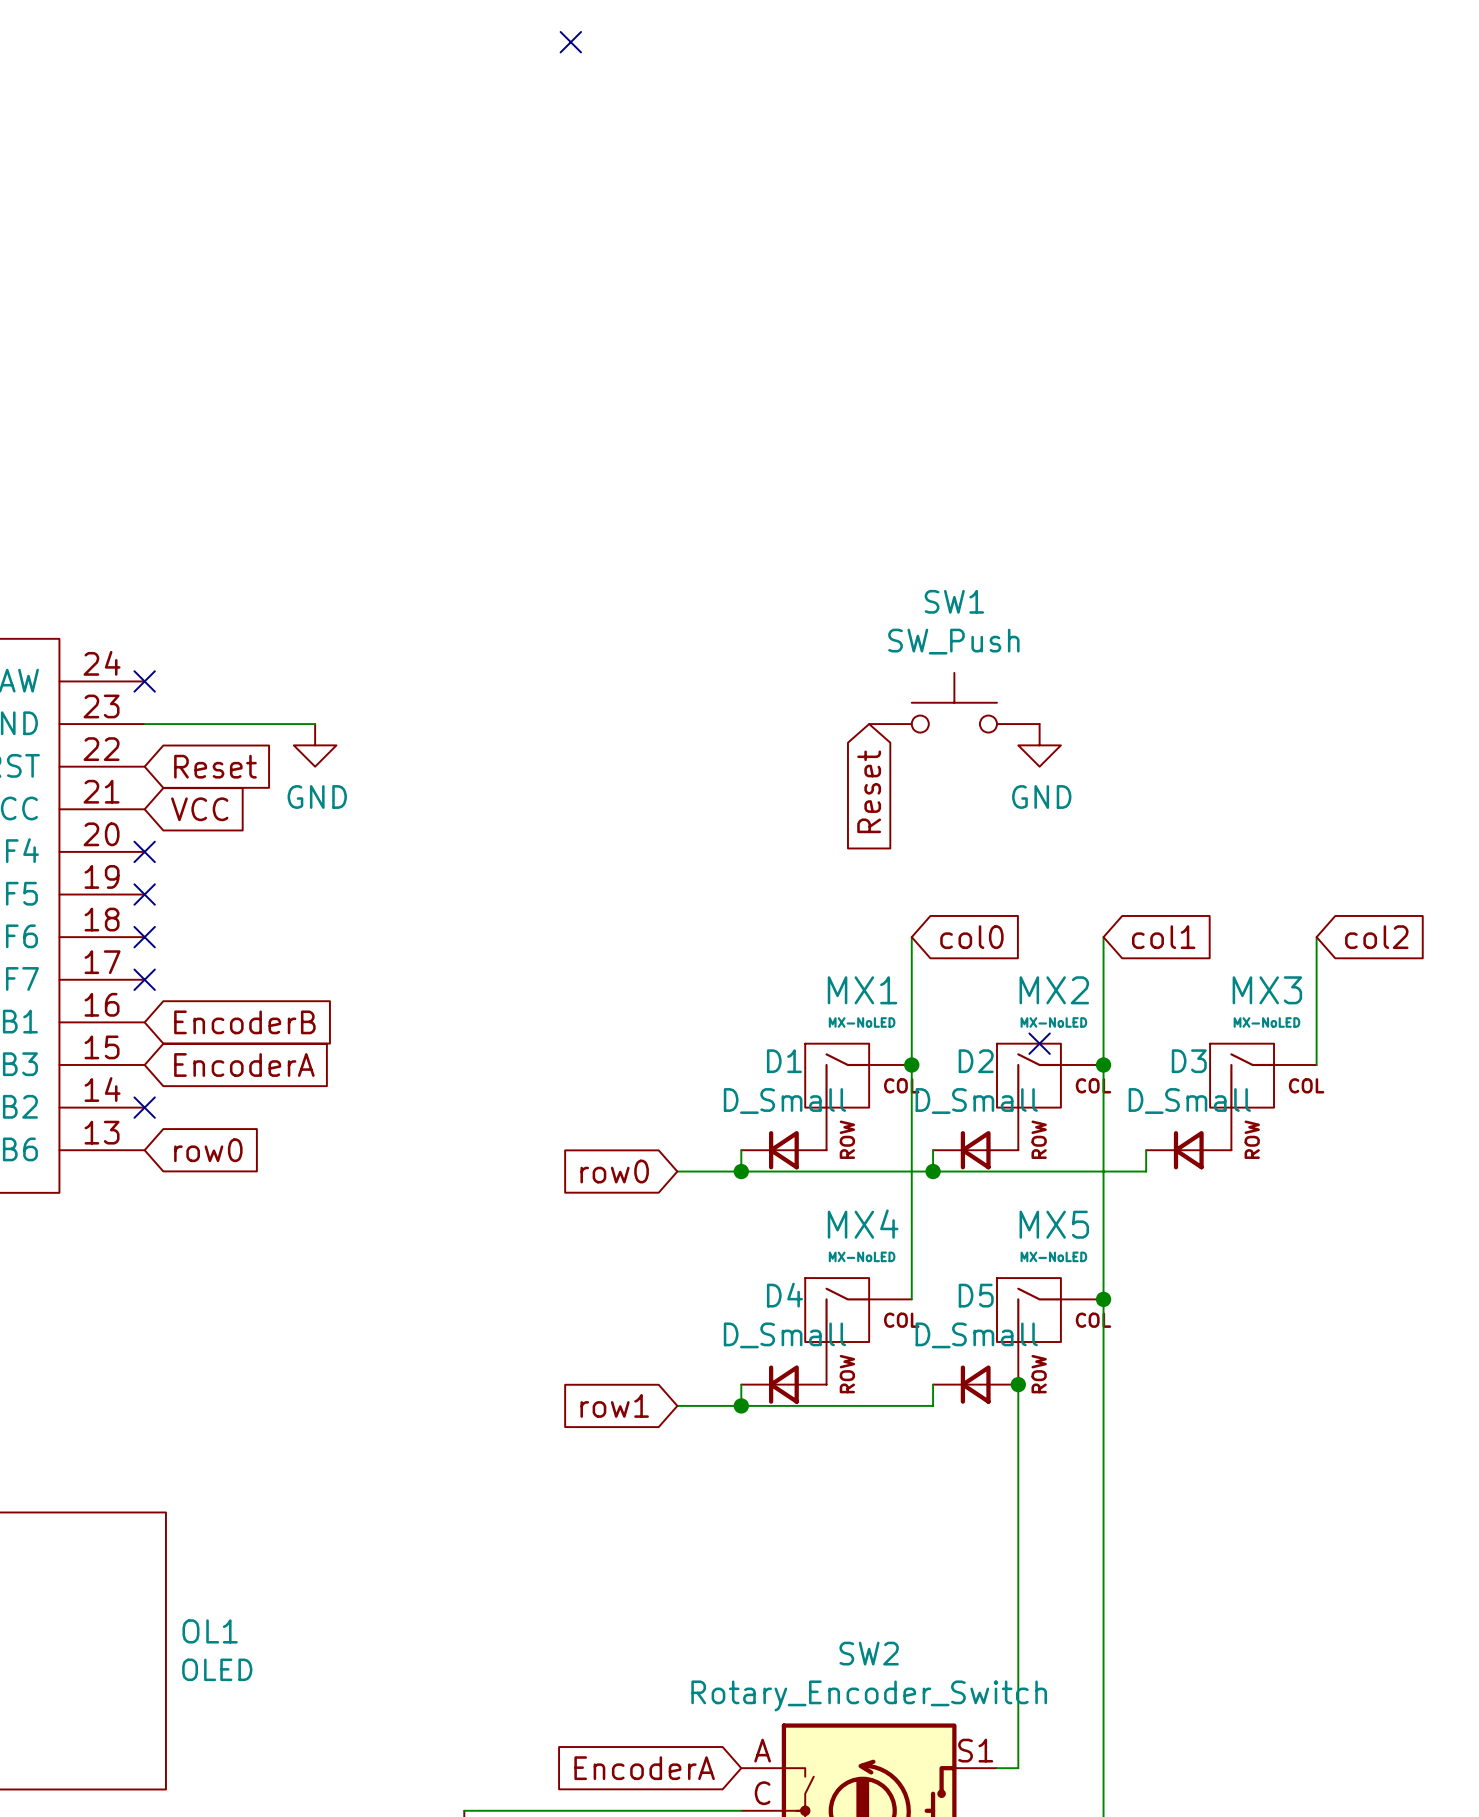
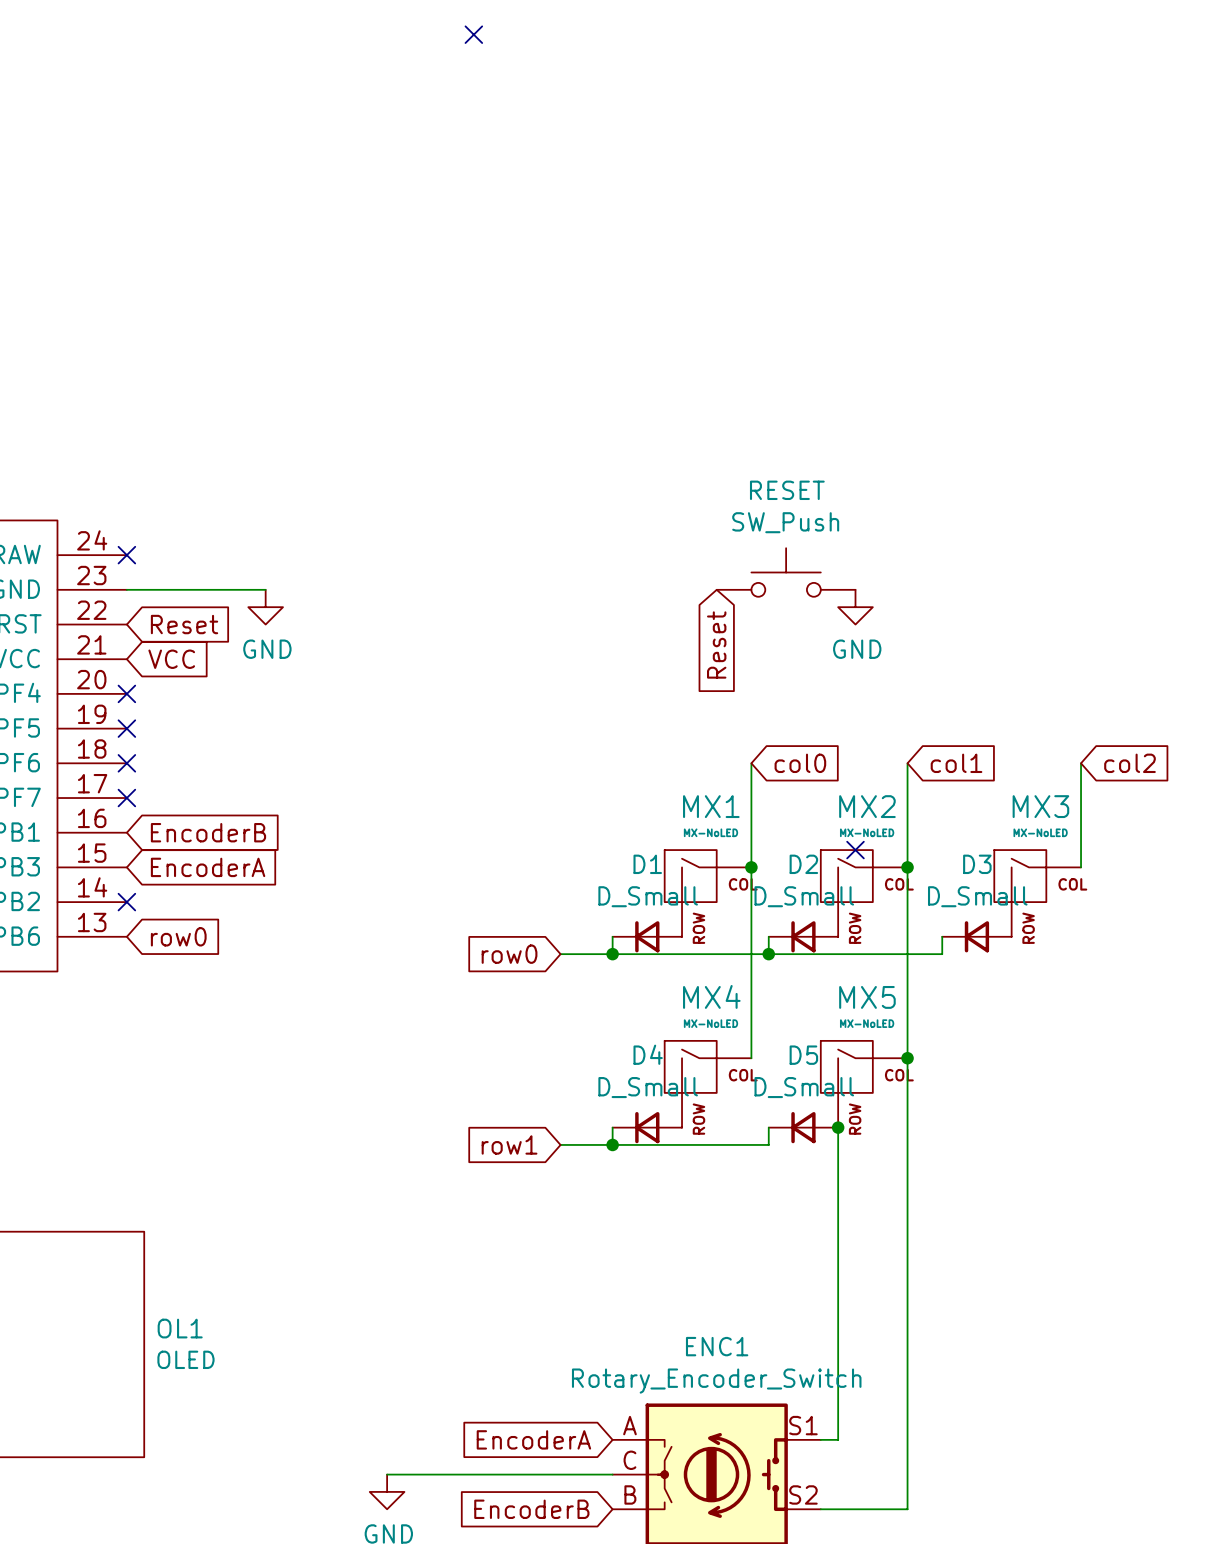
SW1 name: SW1 (954, 601) -> RESET (787, 490)
SW2 name: SW2 (869, 1653) -> ENC1 (717, 1346)

